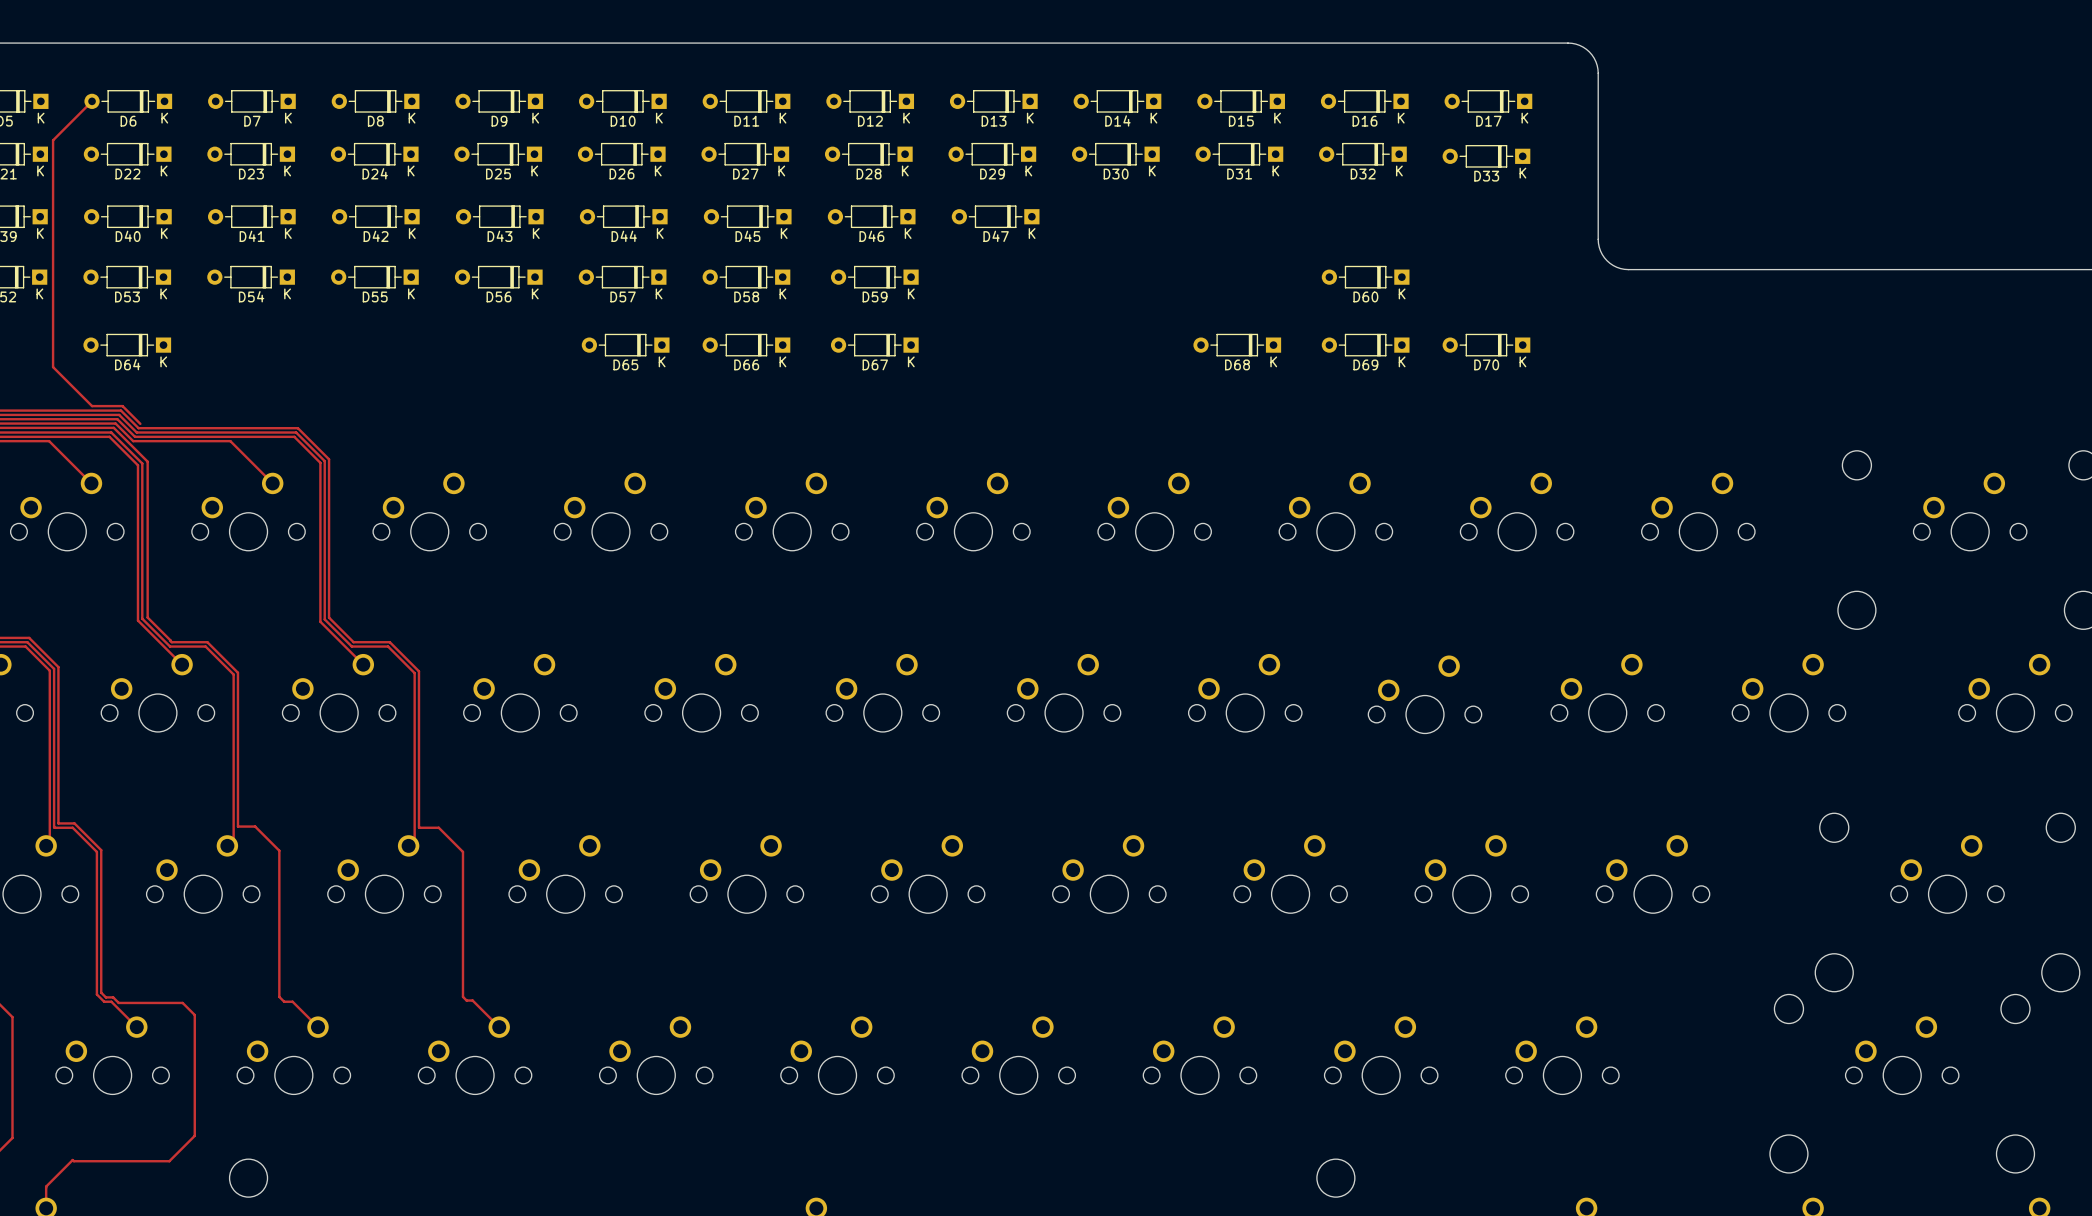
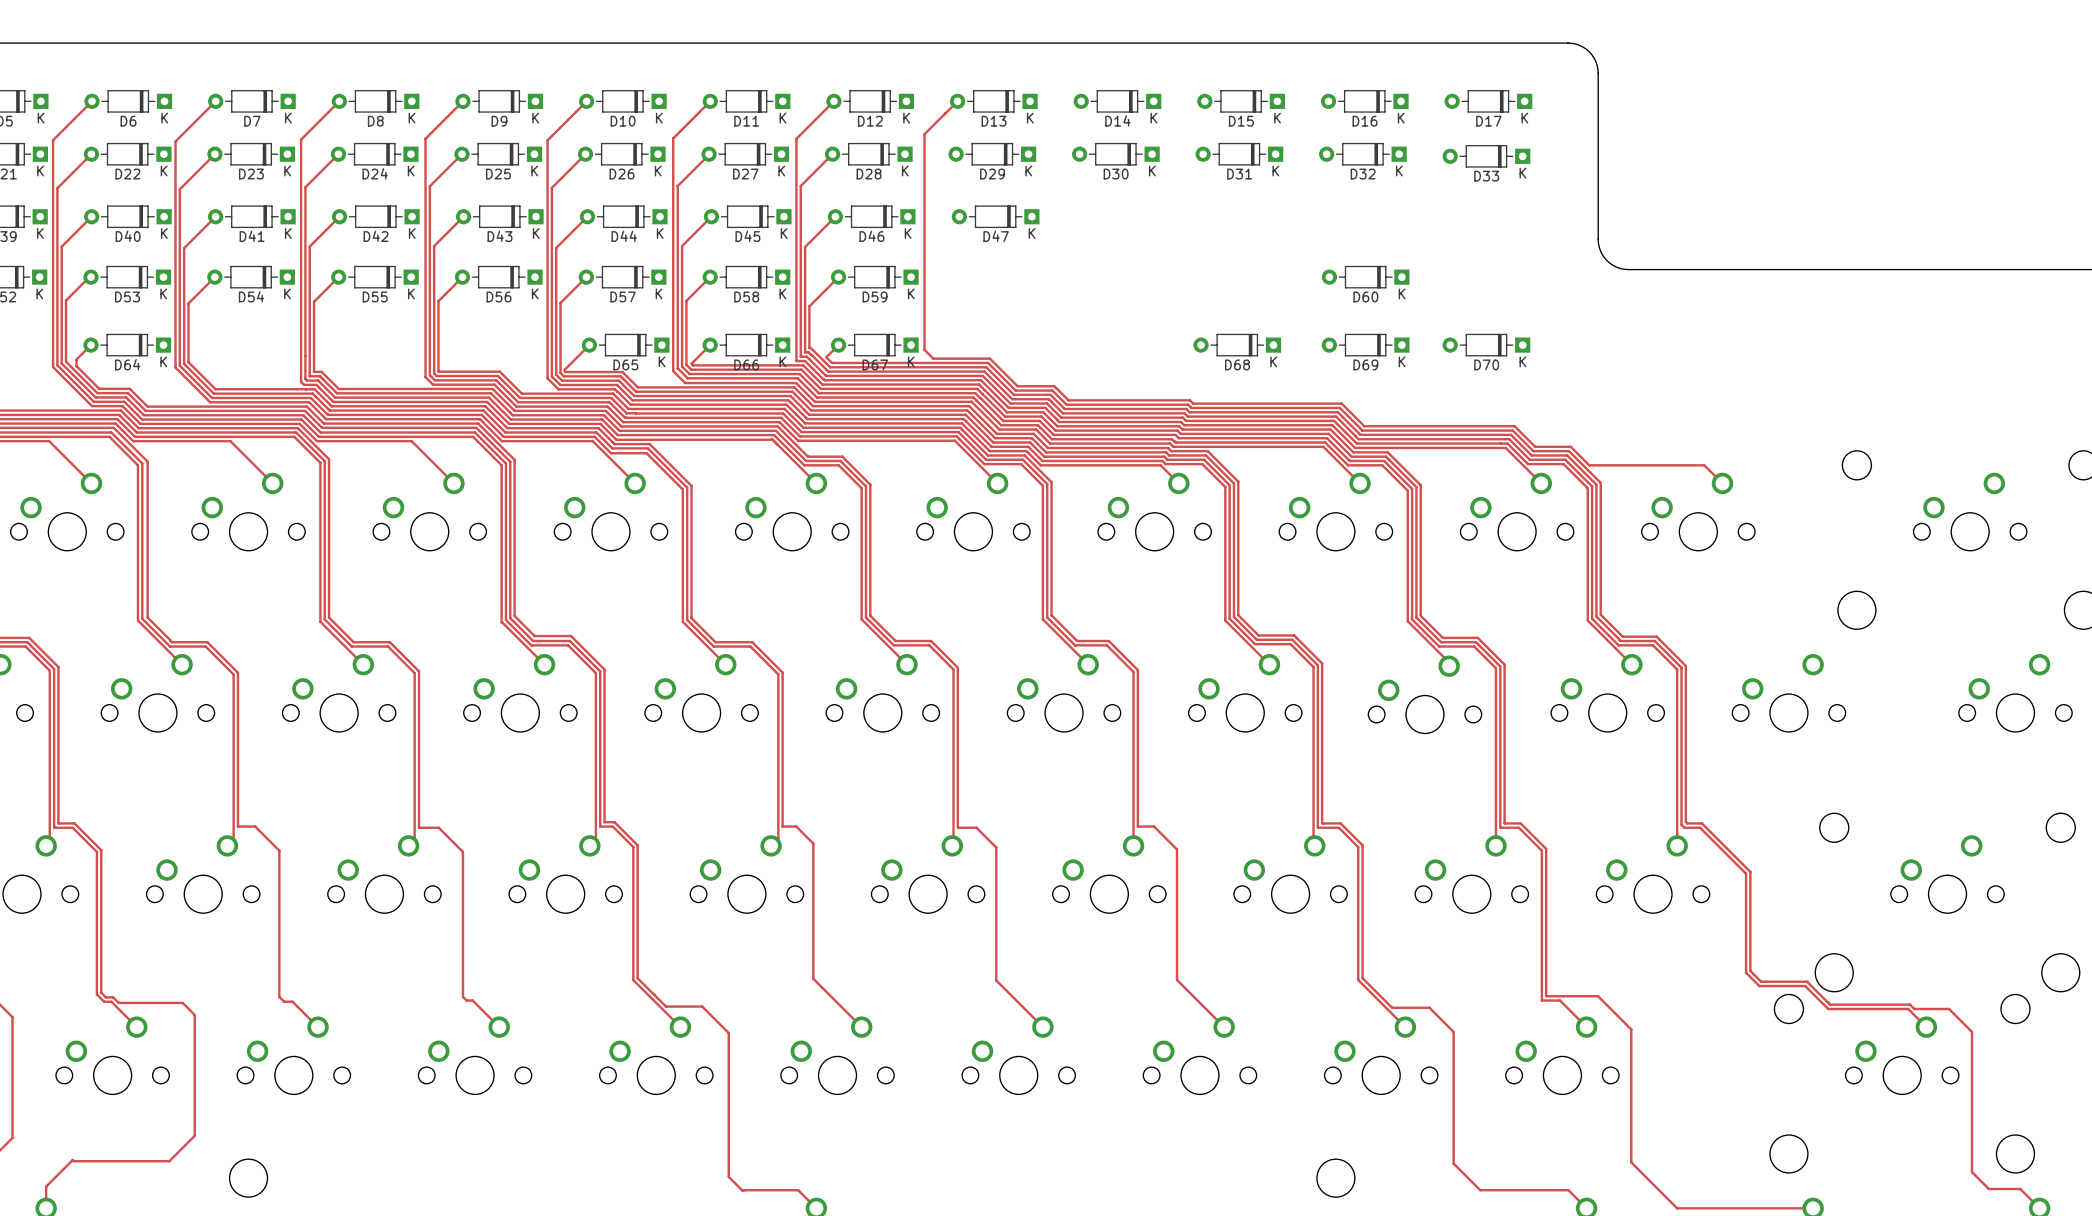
top track: none -> (215, 101) (175, 141) (175, 367) (210, 402) (309, 402) (325, 418)
top track: none -> (339, 101) (301, 139) (301, 381) (304, 384) (316, 384) (333, 401) (487, 401) (509, 423) (600, 423) (616, 439) (772, 439) (816, 483)
top track: none -> (462, 101) (425, 138) (425, 377) (433, 384) (494, 384) (516, 406) (607, 406) (623, 422) (779, 422) (798, 440) (954, 440) (997, 483)
top track: none -> (586, 101) (547, 140) (547, 378) (558, 389) (614, 389) (630, 404) (786, 404) (805, 423) (962, 423) (989, 451) (1026, 451) (1040, 465) (1160, 465) (1178, 483)
top track: none -> (710, 101) (673, 138) (673, 371) (685, 383) (796, 383) (814, 401) (971, 401) (999, 429) (1036, 429) (1050, 443) (1170, 443) (1173, 446) (1323, 446) (1360, 483)
top track: none -> (833, 101) (796, 138) (796, 361) (805, 361) (824, 380) (980, 380) (1008, 407) (1045, 407) (1059, 421) (1180, 421) (1184, 425) (1332, 425) (1355, 447) (1505, 447) (1541, 483)
top track: none -> (957, 101) (945, 113)
top track: none -> (945, 113) (924, 134) (924, 349) (933, 358) (989, 358) (1017, 386) (1054, 386) (1068, 400) (1189, 400) (1193, 403) (1341, 403) (1364, 426) (1514, 426) (1535, 446) (1570, 446) (1589, 465) (1704, 465) (1722, 483)
top track: none -> (91, 154) (57, 188) (57, 365) (93, 401) (124, 401) (142, 419) (301, 419) (318, 436) (473, 436) (501, 465) (501, 622) (544, 664)
top track: none -> (214, 154) (179, 189) (179, 365) (212, 397) (310, 397) (327, 414)
top track: none -> (338, 154) (305, 187) (305, 377)
top track: none -> (462, 154) (429, 186) (429, 375) (434, 380) (496, 380) (518, 402) (609, 402) (625, 417) (781, 417) (799, 436) (956, 436) (984, 464) (1021, 464) (1042, 485) (1042, 619) (1088, 664)
top track: none -> (585, 154) (551, 187) (551, 376) (560, 385) (617, 385) (632, 400) (788, 400) (807, 419) (963, 419) (991, 446) (1028, 446) (1042, 461) (1162, 461) (1165, 464) (1202, 464) (1225, 487) (1225, 620) (1269, 664)
top track: none -> (709, 154) (677, 186)
top track: none -> (832, 154) (800, 186) (800, 356) (806, 356) (826, 375) (982, 375) (1010, 403) (1047, 403) (1061, 417) (1182, 417) (1186, 420) (1334, 420) (1356, 443)
top track: none -> (677, 185) (677, 368) (687, 378) (797, 378) (816, 397) (973, 397) (1001, 425) (1037, 425) (1051, 439) (1171, 439) (1175, 442) (1325, 442) (1348, 465) (1382, 465) (1407, 490) (1407, 621) (1451, 664)
top track: none -> (91, 216) (61, 246) (61, 363) (95, 397) (126, 397) (143, 415) (303, 415) (320, 432) (474, 432) (505, 463) (505, 619) (531, 645) (568, 645) (595, 673) (595, 839) (589, 845)
top track: none -> (215, 216) (184, 248) (184, 363) (213, 393) (312, 393) (328, 409)
top track: none -> (339, 216) (309, 246) (309, 376) (319, 376) (337, 393) (490, 393) (510, 412)
top track: none -> (463, 216) (434, 246) (434, 373) (436, 376) (498, 376) (520, 397) (611, 397) (626, 413) (783, 413) (801, 432) (958, 432) (986, 459) (1022, 459) (1047, 484) (1047, 617) (1075, 645) (1106, 645) (1133, 671) (1133, 845)
top track: none -> (587, 216) (556, 248) (556, 374) (562, 380) (618, 380) (634, 396) (790, 396) (804, 410)
top track: none -> (711, 216) (682, 246) (682, 366) (689, 374) (799, 374) (818, 392)
top track: none -> (835, 216) (805, 247) (805, 352) (808, 352) (828, 371) (984, 371) (1012, 399) (1048, 399) (1062, 413) (1184, 413) (1187, 416) (1336, 416) (1355, 436)
top track: none -> (91, 277) (66, 300) (66, 361) (97, 393) (127, 393) (145, 410) (305, 410) (322, 427) (476, 427) (510, 461) (510, 618) (533, 641) (569, 641) (600, 671) (600, 826) (612, 826) (633, 847) (633, 980) (680, 1027)
top track: none -> (214, 277) (188, 303) (188, 362) (215, 389) (305, 389)
top track: none -> (338, 277) (314, 301) (314, 371) (321, 371) (338, 388) (492, 388) (514, 410) (605, 410) (621, 426) (777, 426) (807, 456) (842, 456) (870, 484) (870, 615) (895, 641) (931, 641) (957, 667) (957, 827) (976, 827) (996, 847) (996, 980) (1042, 1027)
top track: none -> (462, 277) (438, 301) (438, 371) (499, 371) (521, 393) (613, 393) (628, 408) (784, 408) (803, 427) (960, 427) (987, 455) (1024, 455) (1051, 482) (1051, 615) (1077, 641) (1108, 641) (1137, 670) (1137, 826) (1154, 826) (1177, 849) (1177, 980) (1224, 1027)
top track: none -> (586, 277) (560, 303) (560, 372) (563, 376) (620, 376) (636, 391) (792, 391) (811, 410) (967, 410) (995, 438) (1031, 438) (1046, 452) (1166, 452) (1169, 455) (1205, 455) (1233, 483) (1233, 616) (1256, 639) (1292, 639) (1317, 665) (1317, 827) (1338, 827) (1358, 847) (1358, 980) (1405, 1027)
top track: none -> (710, 277) (686, 300) (686, 364) (691, 369) (801, 369) (820, 388) (977, 388) (1005, 416) (1041, 416) (1055, 430) (1177, 430) (1180, 433) (1328, 433) (1351, 456) (1385, 456) (1416, 487) (1416, 617) (1441, 642) (1476, 642) (1500, 666) (1500, 827) (1518, 827) (1541, 850) (1541, 1000) (1560, 1000) (1586, 1027)
top track: none -> (838, 277) (809, 306) (809, 348) (830, 367) (986, 367) (1013, 394) (1050, 394) (1064, 409) (1186, 409) (1189, 412) (1337, 412) (1360, 434) (1511, 434) (1531, 455) (1567, 455) (1596, 484) (1596, 616) (1620, 641) (1654, 641) (1681, 667) (1681, 824) (1684, 827) (1700, 827) (1746, 873) (1746, 972) (1759, 986) (1805, 986) (1828, 1008) (1908, 1008) (1926, 1027)
top track: none -> (91, 345) (76, 359) (76, 366) (99, 388) (129, 388) (147, 406) (306, 406) (323, 423) (478, 423) (514, 459) (514, 616) (534, 636) (571, 636) (604, 669) (604, 822) (614, 822) (637, 845) (637, 978) (666, 1006) (702, 1006) (728, 1033) (728, 1176) (742, 1190) (798, 1190) (816, 1208)
top track: none -> (589, 345) (564, 369) (565, 372) (622, 372) (637, 387) (794, 387) (810, 403)
top track: none -> (710, 345) (692, 363)
top track: none -> (838, 345) (826, 356) (831, 362) (988, 362) (1015, 390) (1052, 390) (1066, 404) (1188, 404) (1191, 407) (1339, 407) (1362, 430) (1512, 430) (1533, 451) (1568, 451) (1600, 482) (1600, 614) (1622, 636) (1656, 636) (1685, 665) (1685, 821) (1701, 823) (1750, 871) (1750, 970) (1761, 981) (1807, 981) (1828, 1002)
top track: none -> (692, 363) (693, 365) (803, 365) (822, 384) (979, 384) (984, 390)
top track: none -> (305, 378) (306, 380) (318, 380) (335, 397) (488, 397) (510, 419) (602, 419) (617, 435) (774, 435) (804, 465) (838, 465) (861, 488) (861, 619) (906, 664)
top track: none -> (306, 389) (314, 389) (331, 406) (485, 406) (507, 428) (598, 428) (614, 444) (649, 444) (691, 485) (691, 618) (715, 642) (752, 642) (782, 672) (782, 826) (796, 826) (813, 843) (813, 978) (861, 1027)
top track: none -> (984, 390) (1006, 412) (1043, 412) (1057, 426) (1179, 426) (1182, 429) (1330, 429) (1353, 452) (1387, 452) (1420, 485) (1420, 615) (1442, 637) (1477, 637) (1504, 664) (1504, 823) (1520, 823) (1546, 848) (1546, 996) (1597, 996) (1631, 1029) (1631, 1162) (1677, 1208) (1813, 1208)
top track: none -> (818, 392) (975, 393) (1003, 420) (1039, 420) (1053, 434) (1175, 434) (1178, 438) (1327, 438) (1349, 460) (1384, 461) (1412, 488) (1412, 619) (1439, 646) (1474, 646) (1495, 668) (1495, 845)
top track: none -> (810, 404) (812, 406) (969, 406) (996, 433) (1033, 433) (1047, 448) (1168, 448) (1171, 451) (1207, 451) (1238, 481) (1238, 615) (1258, 635) (1294, 635) (1322, 663) (1322, 823) (1340, 823) (1362, 845) (1362, 978) (1392, 1007) (1429, 1007) (1453, 1031) (1453, 1163) (1480, 1190) (1568, 1190) (1586, 1208)
top track: none -> (328, 409) (483, 410) (505, 432) (596, 432) (612, 448) (647, 448) (687, 487) (687, 619) (713, 646) (750, 646) (778, 674) (778, 838) (771, 845)
top track: none -> (804, 410) (809, 414) (965, 414) (993, 442) (1030, 442) (1044, 456) (1164, 456) (1167, 459) (1204, 459) (1229, 485) (1229, 618) (1255, 644) (1290, 644) (1313, 667) (1314, 845)
top track: none -> (510, 412) (512, 415) (604, 415) (619, 430) (775, 430) (806, 461) (840, 461) (866, 486) (866, 617) (893, 645) (929, 645) (953, 669) (952, 845)
top track: none -> (327, 414) (481, 414) (503, 436) (594, 436) (611, 453) (646, 453) (682, 489) (682, 621) (725, 664)
top track: none -> (325, 418) (479, 419) (501, 441) (592, 441) (635, 483)
top track: none -> (140, 423) (299, 423) (317, 441) (411, 441) (453, 483)
top track: none -> (1355, 436) (1358, 439) (1509, 439) (1529, 459) (1565, 459) (1592, 486) (1592, 618) (1618, 645) (1653, 645) (1677, 669) (1677, 845)
top track: none -> (1356, 443) (1500, 443)
top track: none -> (1500, 443) (1507, 443) (1528, 464) (1563, 464) (1587, 488) (1587, 620) (1631, 664)
top track: none -> (1828, 1002) (1830, 1004) (1910, 1004) (1914, 1008) (1949, 1008) (1971, 1031) (1971, 1172) (1988, 1189) (2020, 1189) (2039, 1208)

